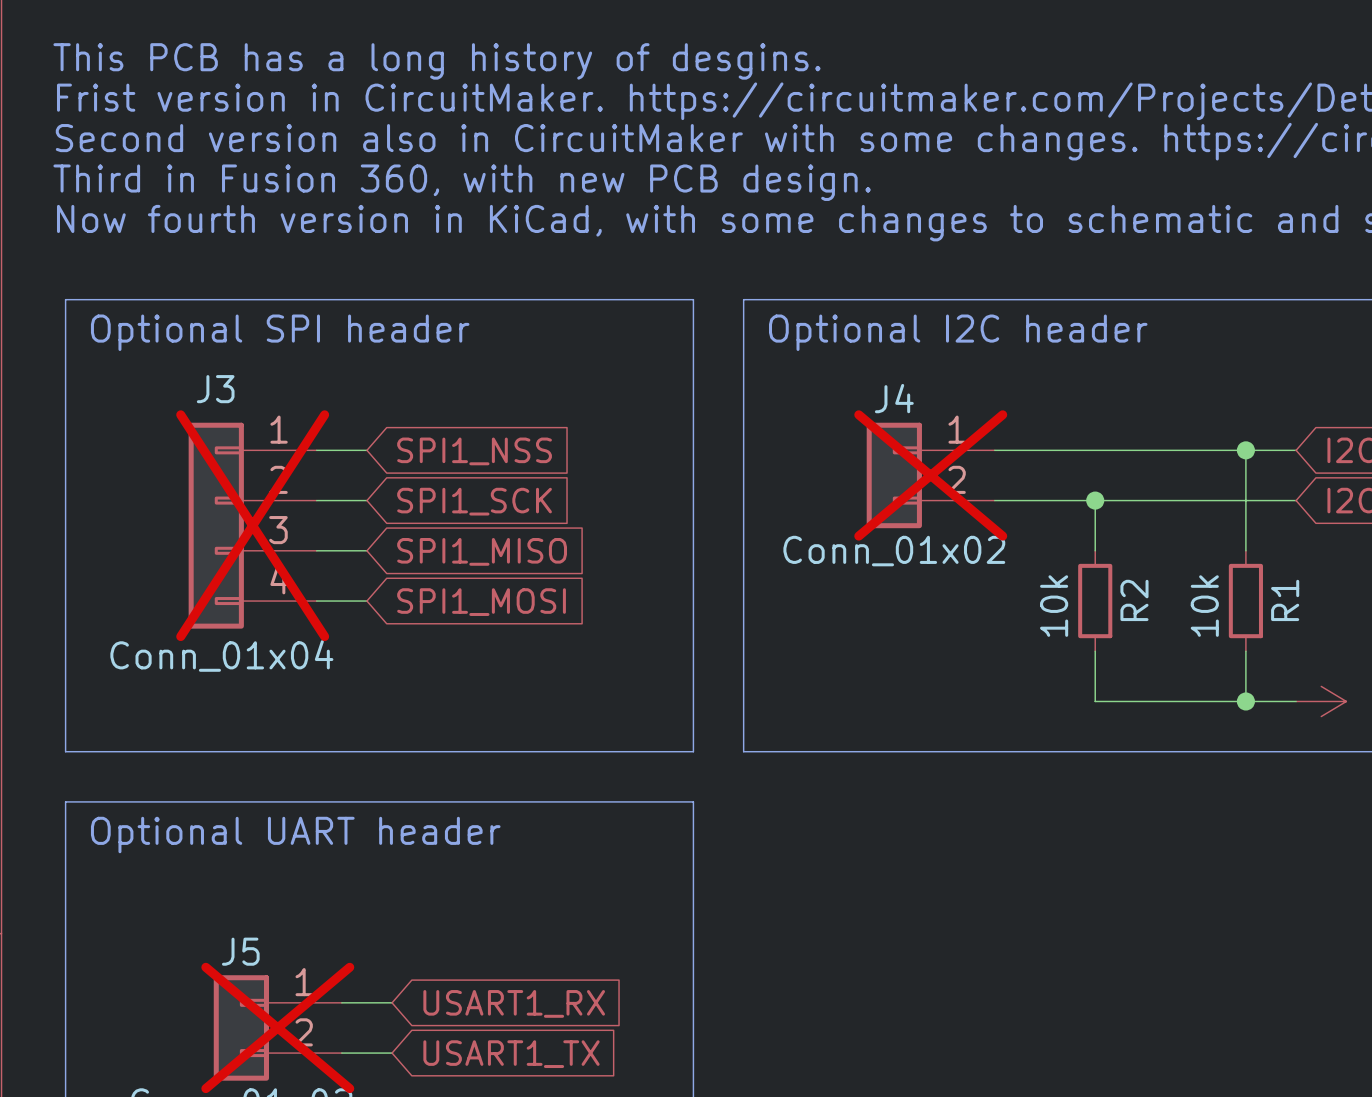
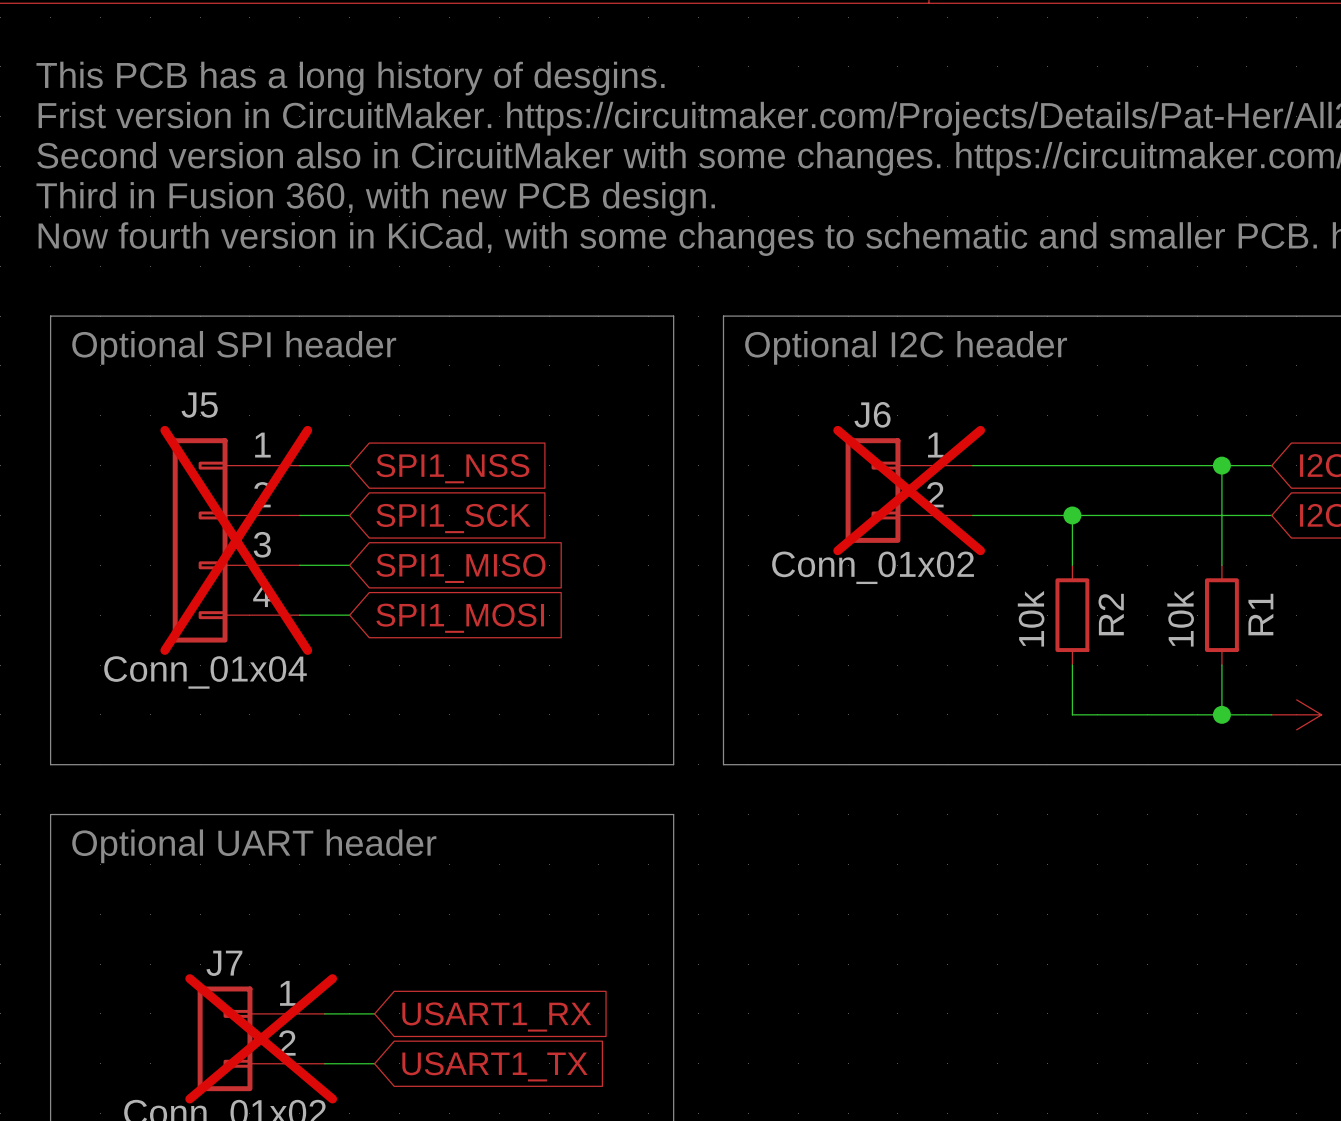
J3 name: J3 (215, 389) -> J5 (199, 405)
J4 name: J4 (894, 398) -> J6 (872, 414)
J5 name: J5 (240, 951) -> J7 (224, 963)

